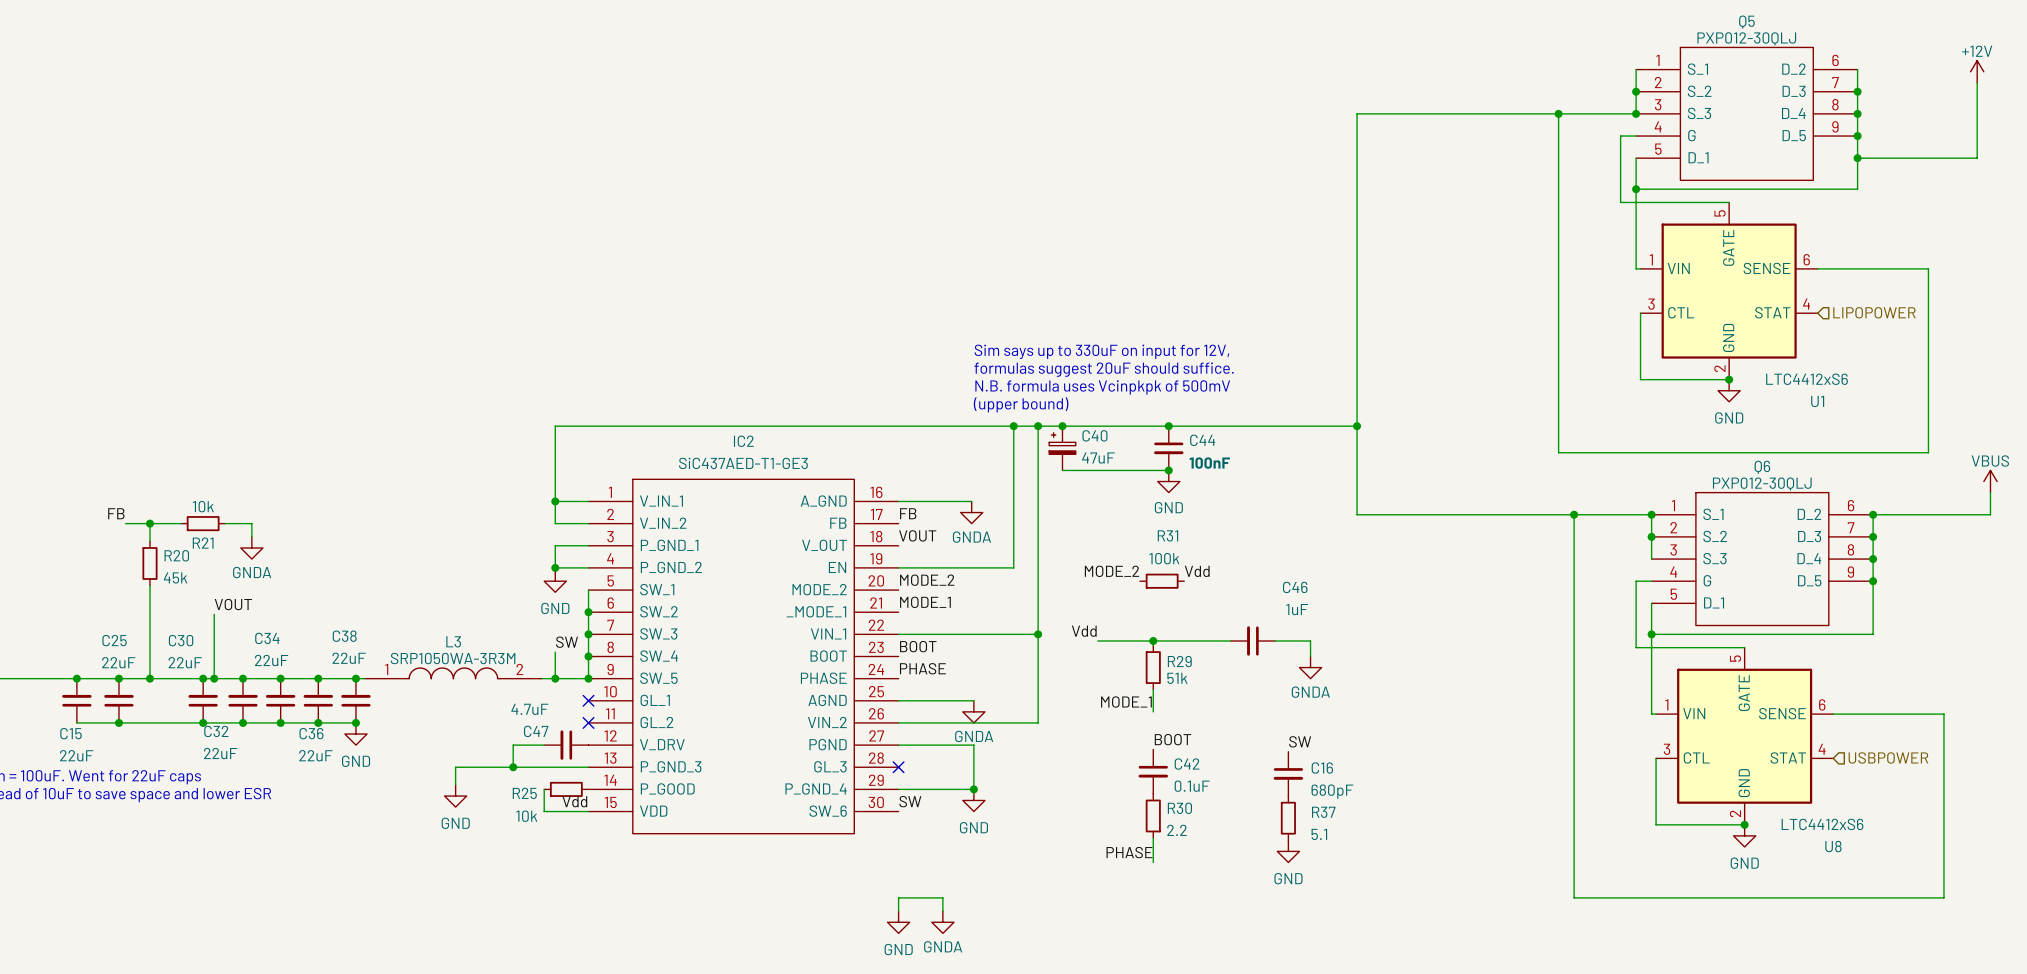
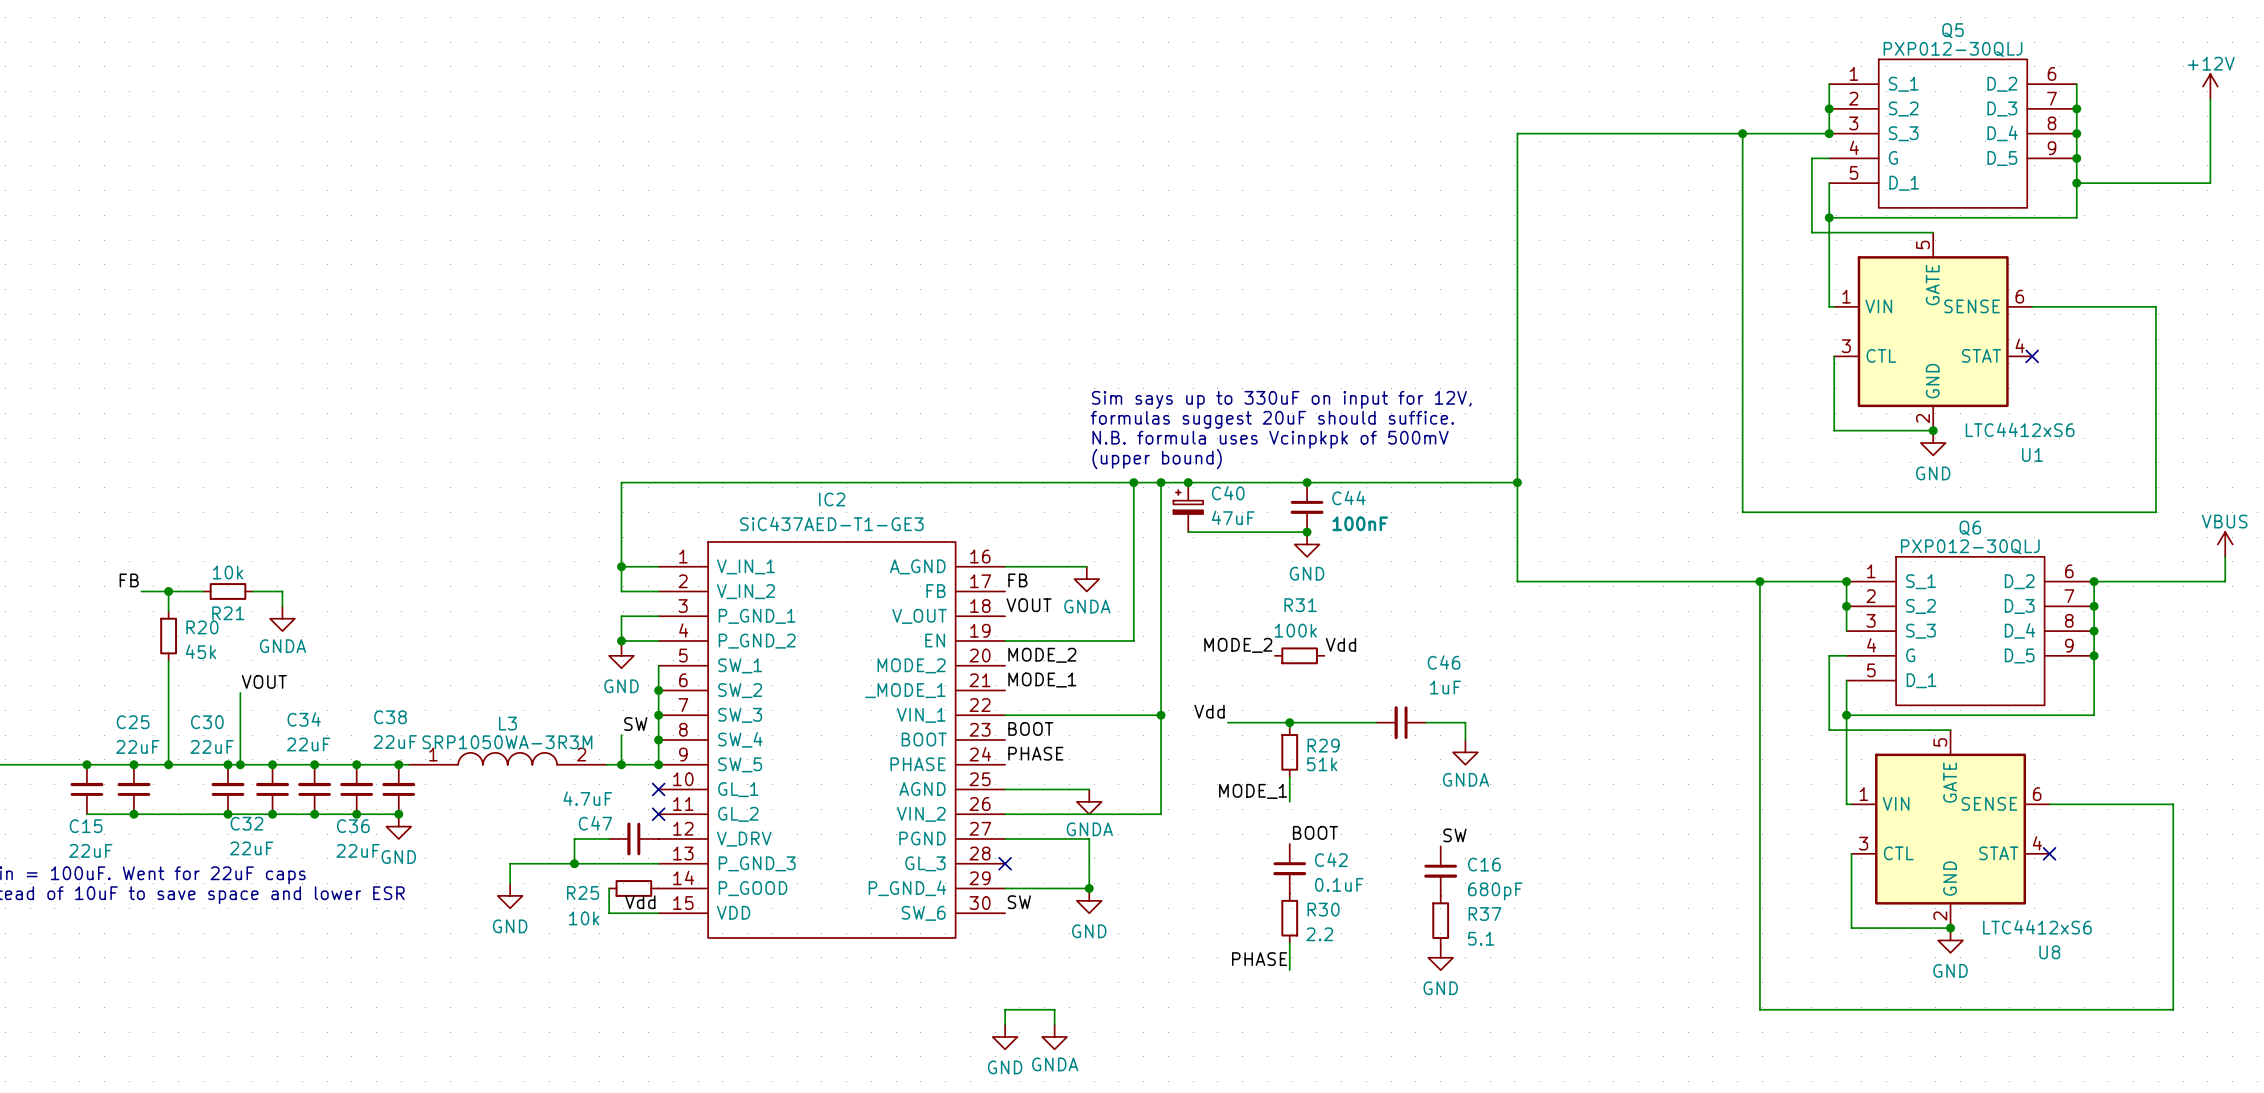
hierarchical label: LIPOPOWER (1874, 312) -> none
no-connect mark: none -> (2032, 356)
hierarchical label: USBPOWER (1888, 757) -> none
no-connect mark: none -> (2049, 853)

